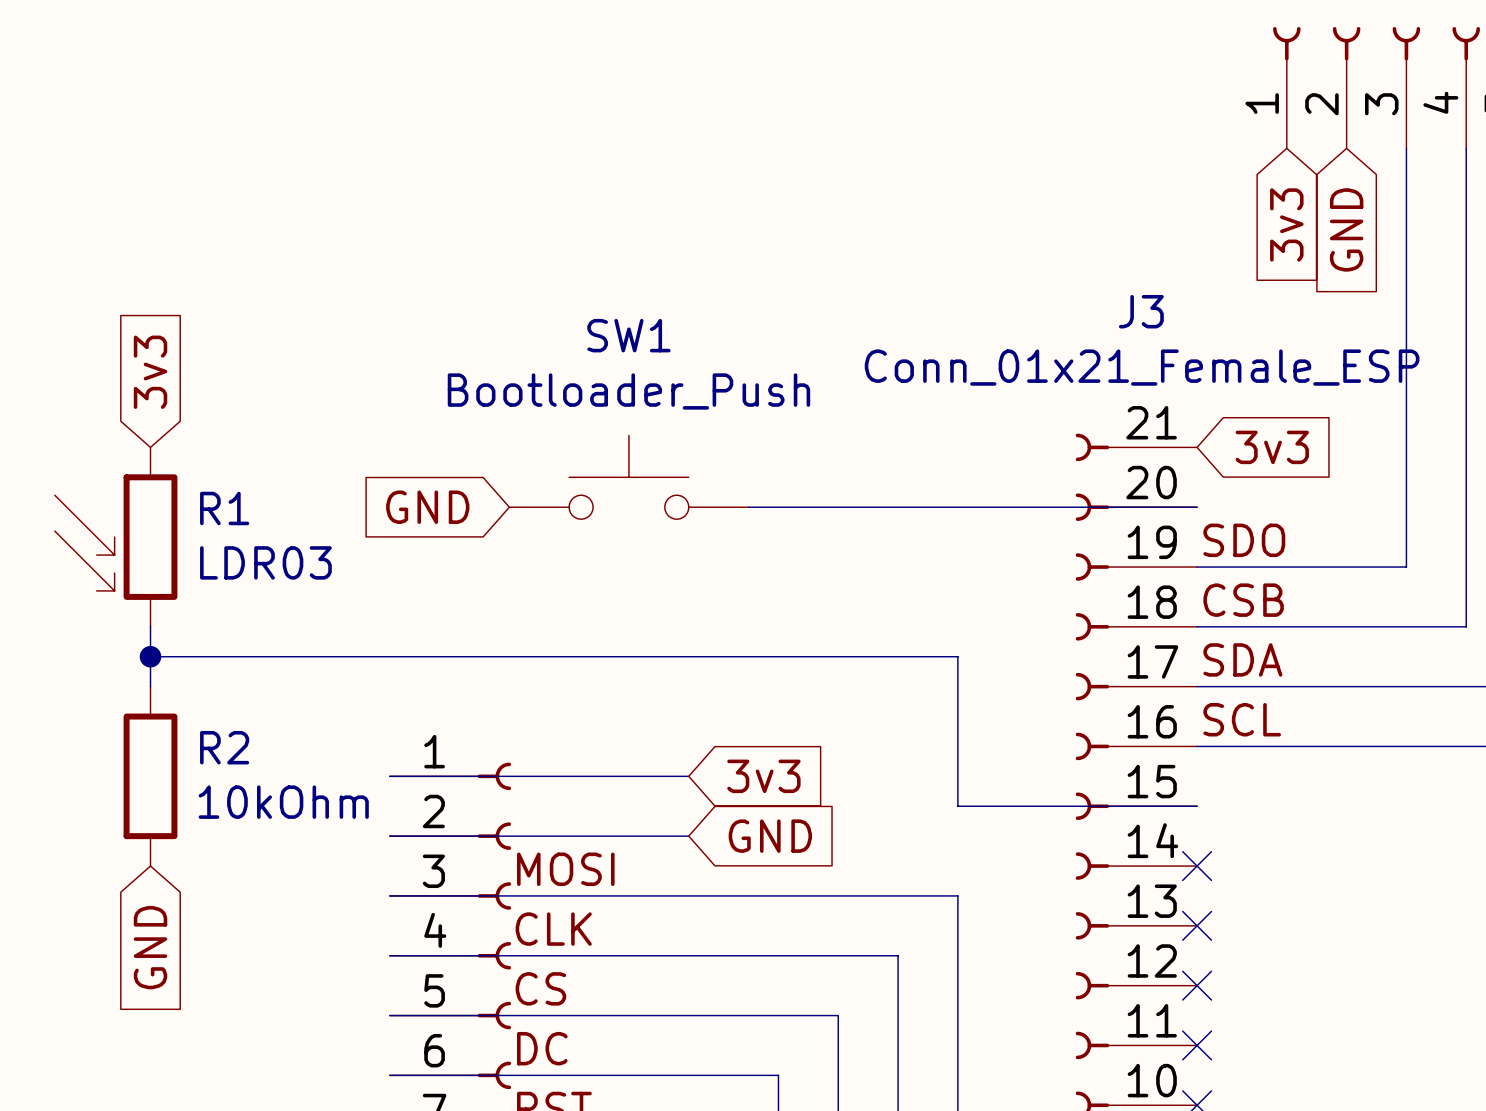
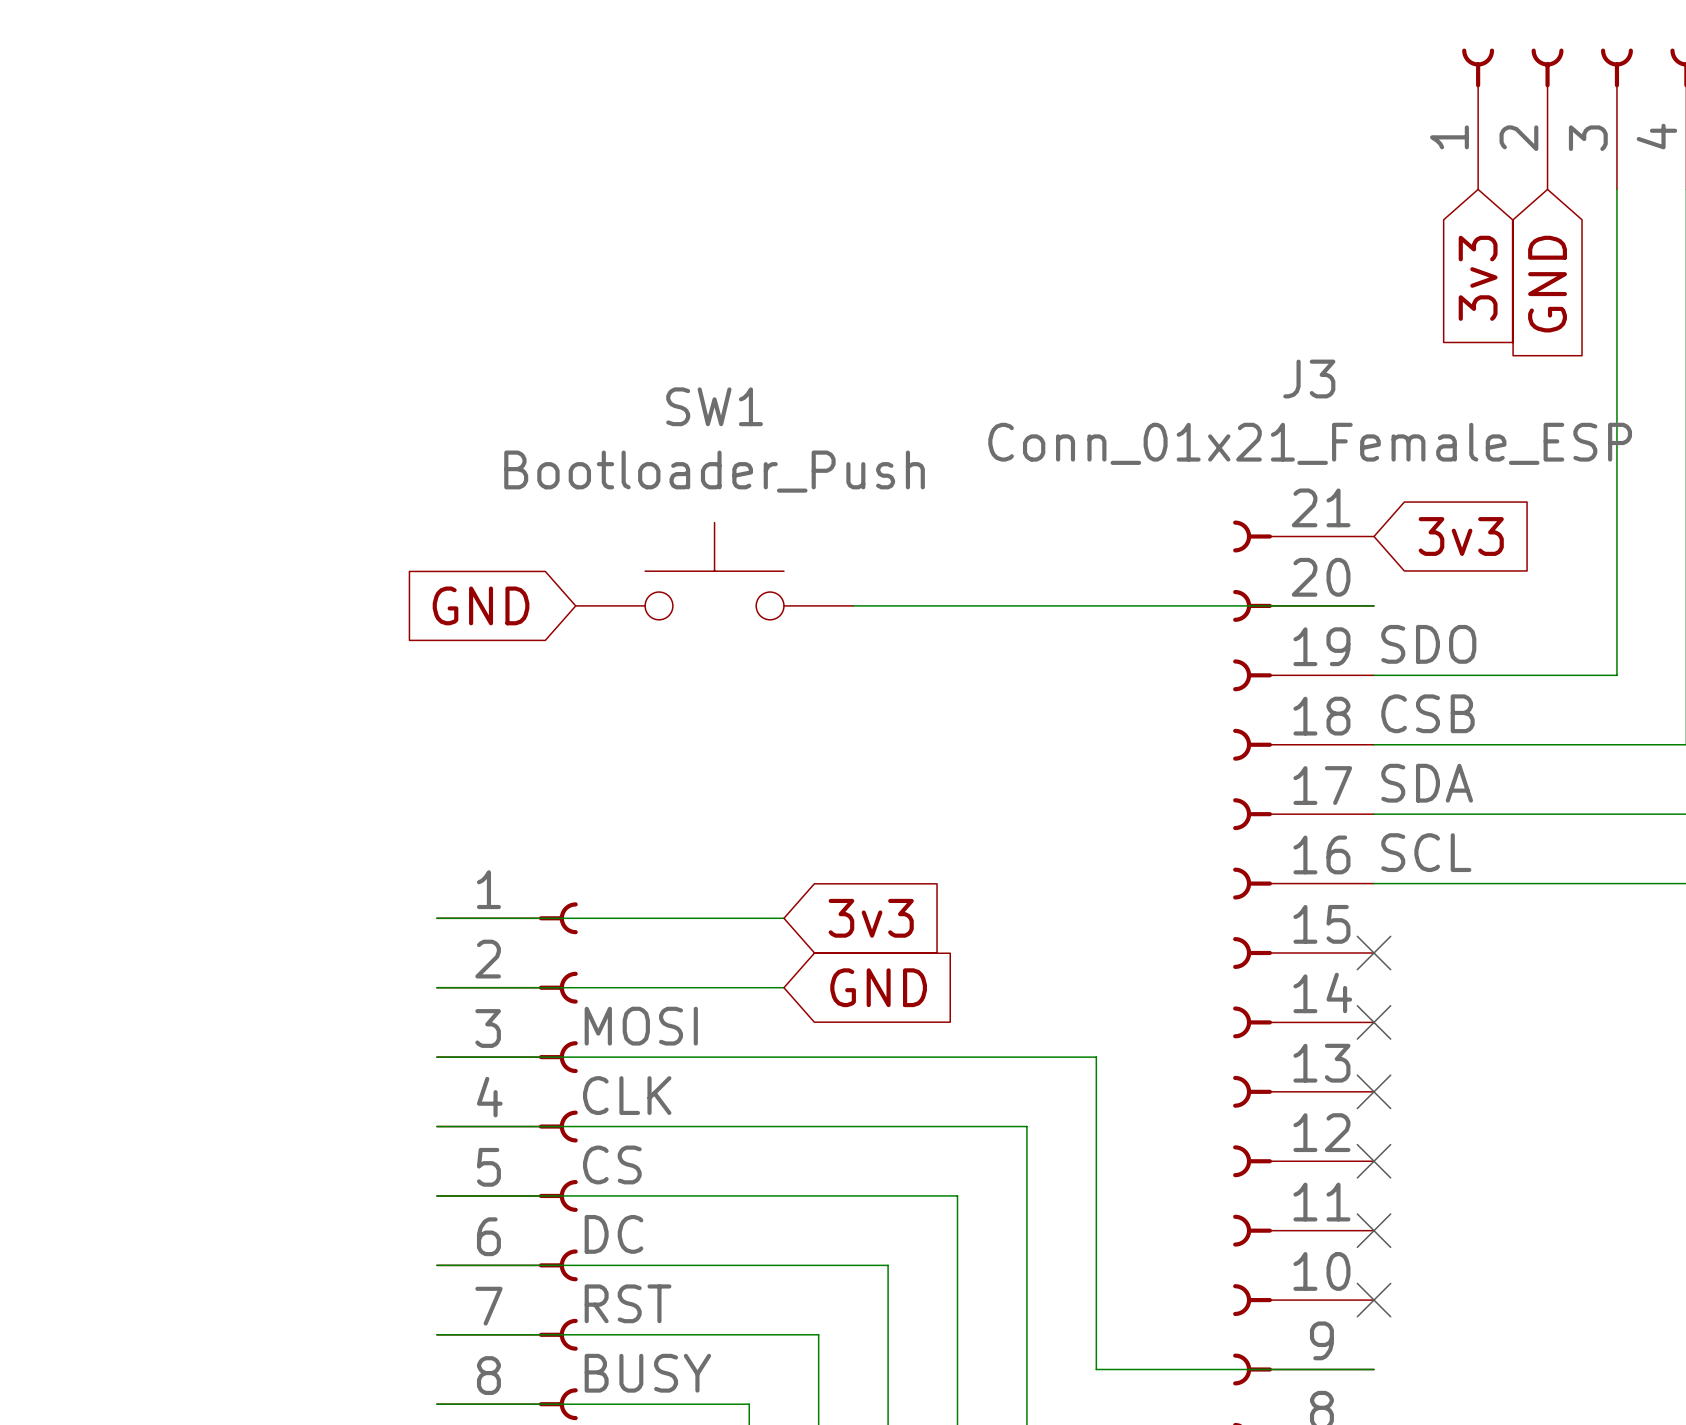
global label: 3v3 (150, 372) -> none
R1: LDR03 (116, 537) -> none
wire: (150, 626) (150, 686) -> none
wire: (150, 656) (957, 656) (957, 806) (1197, 806) -> none
junction: (150, 656) -> none
R2: 10kOhm (150, 776) -> none
no-connect mark: none -> (1374, 953)
global label: GND (150, 947) -> none

